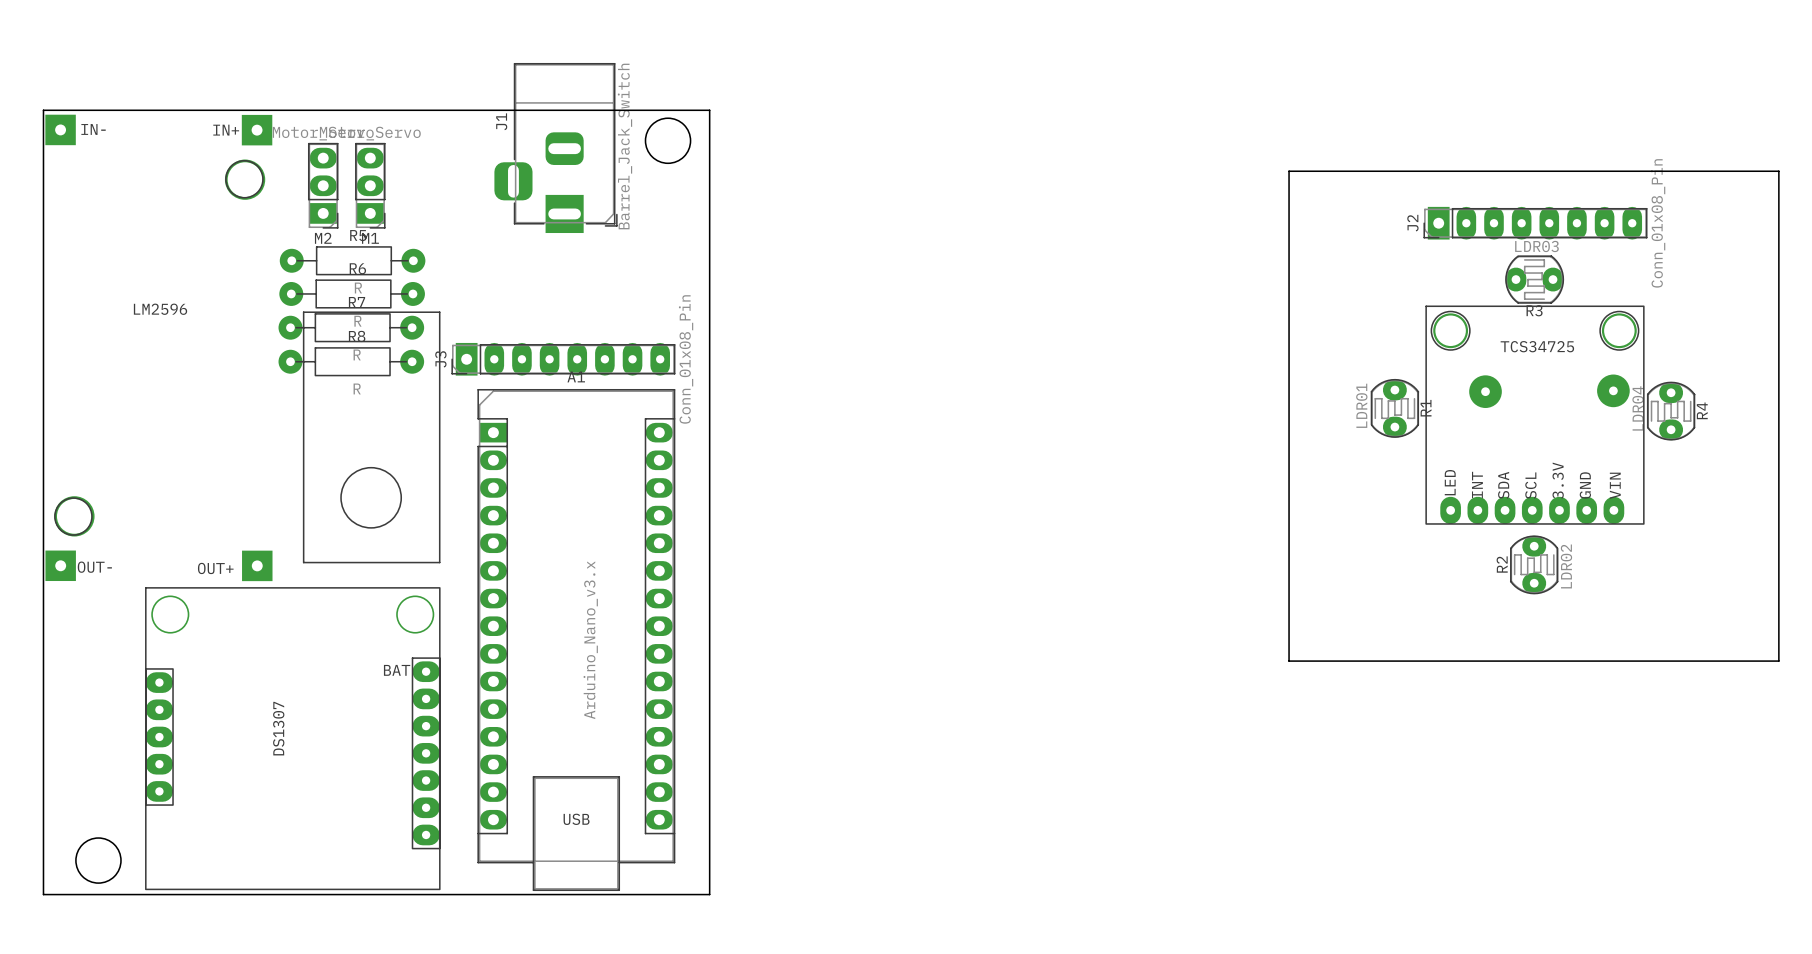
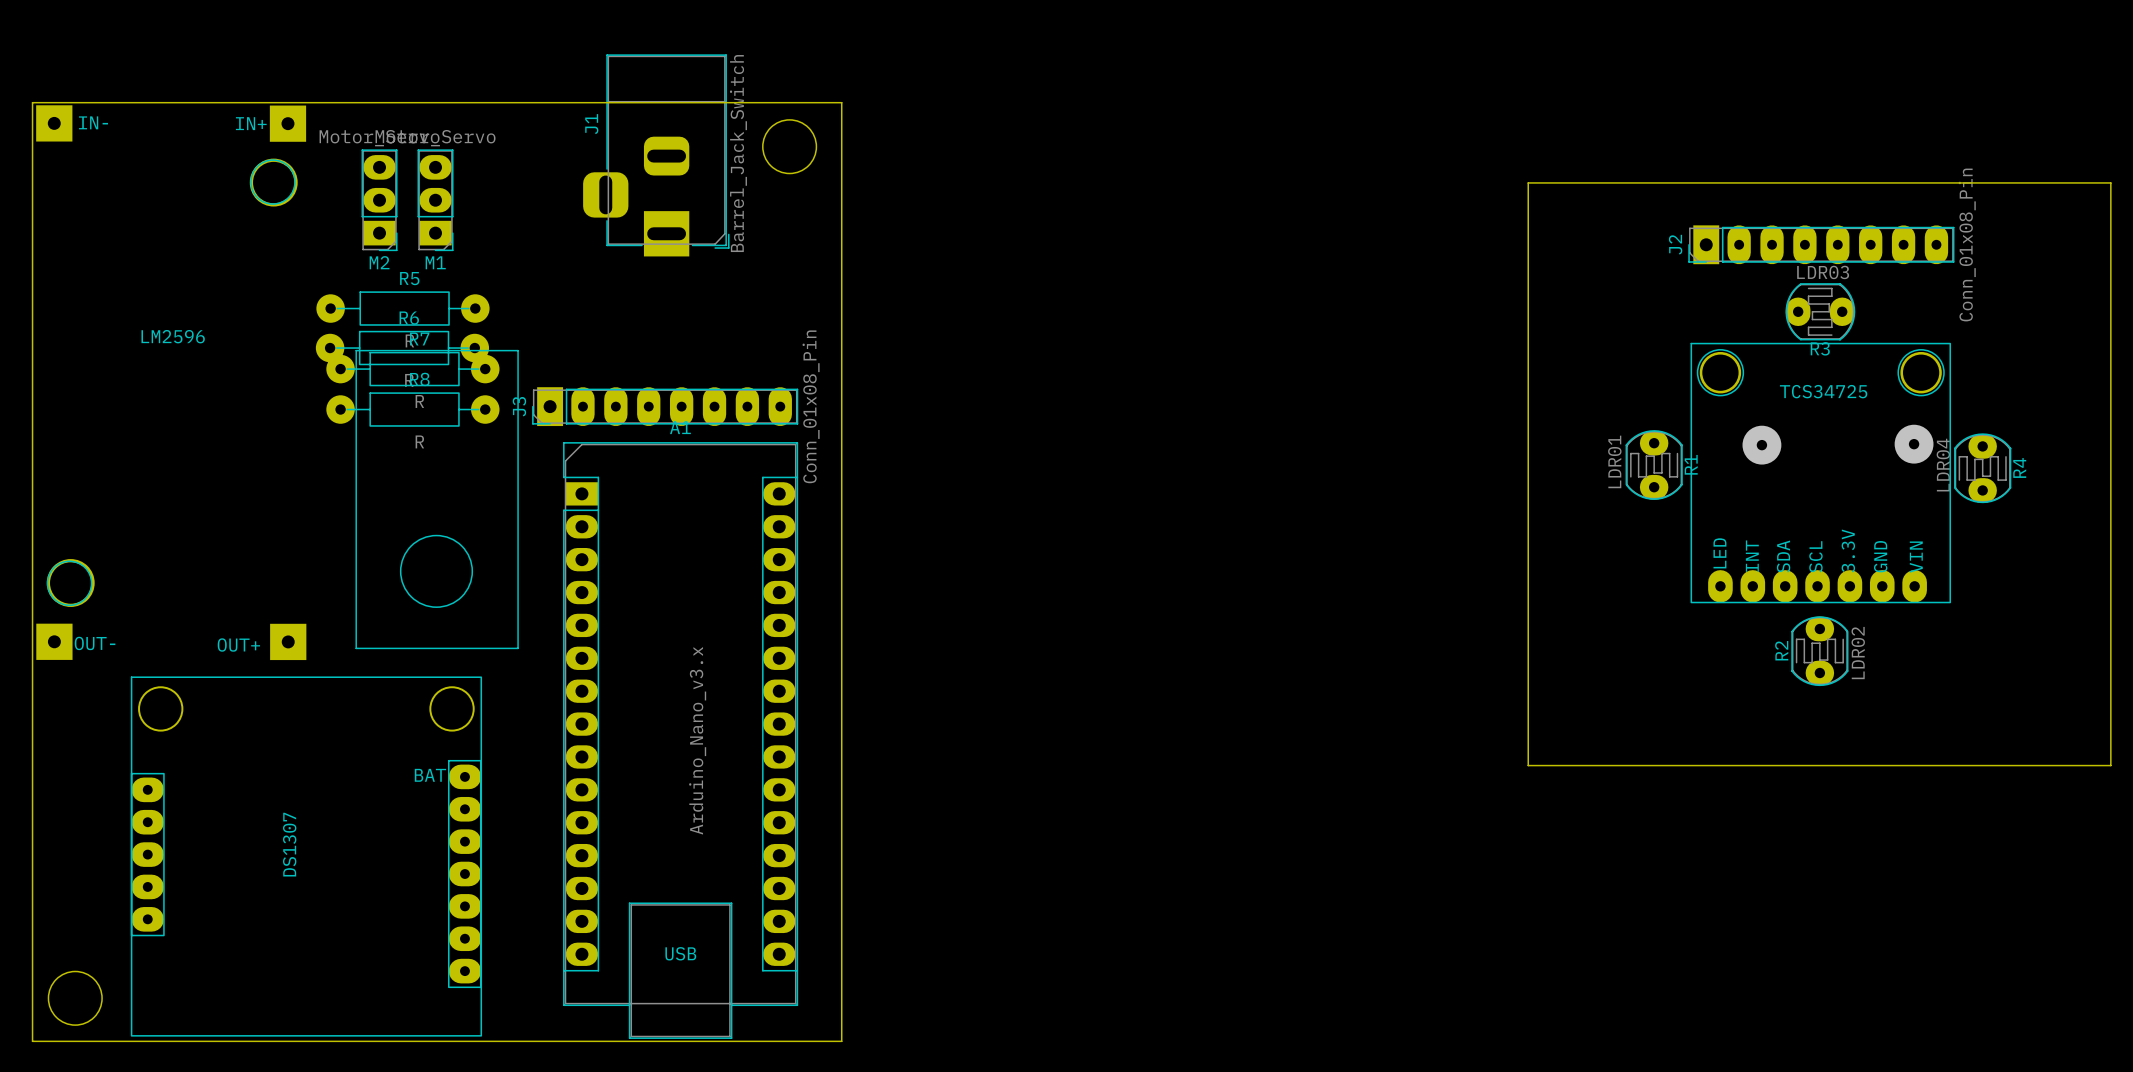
board edge: (43, 110) (709, 110) (709, 894) (43, 894) (43, 110) -> (32, 102) (32, 1041) (841, 1041) (841, 102) (32, 102)
R5 position: (352, 260) -> (402, 308)
R6 position: (352, 293) -> (402, 348)
LM2596 position: (158, 347) -> (171, 382)
DS1307 position: (292, 738) -> (306, 856)
round board edge position: (98, 860) -> (75, 998)

